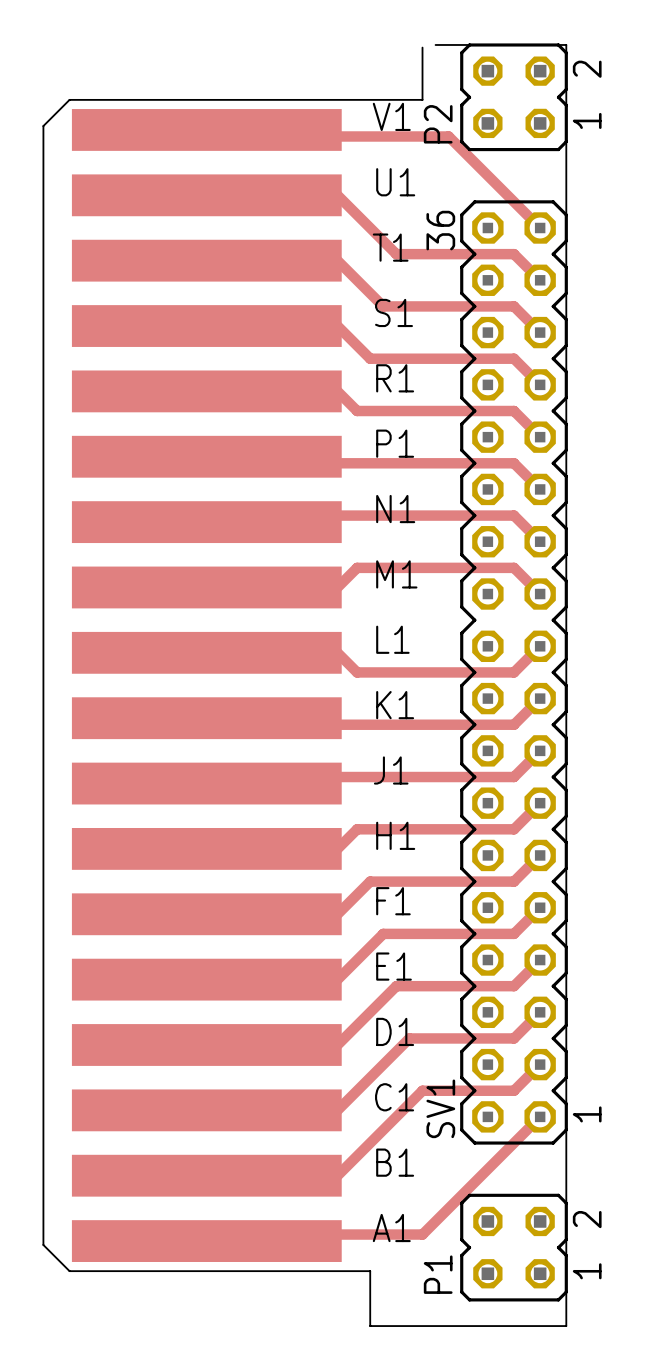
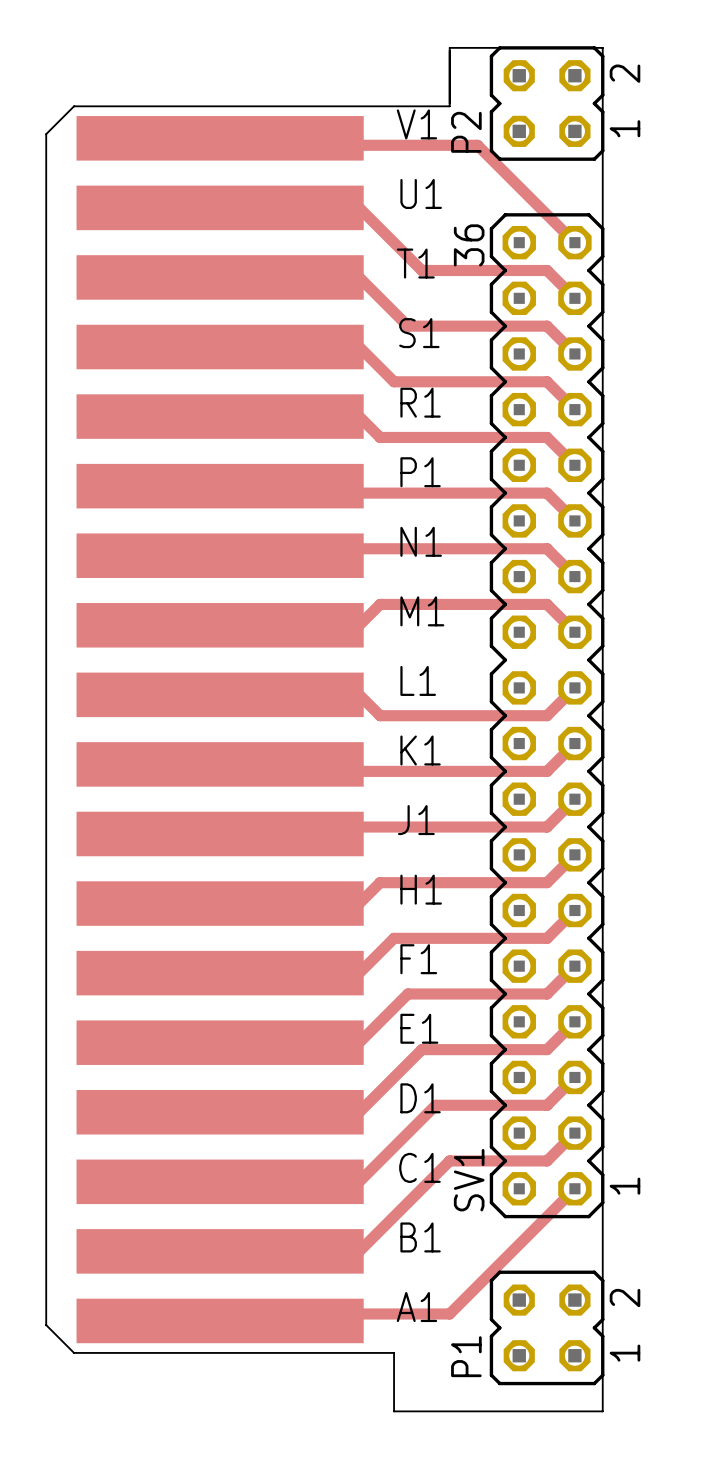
board edge: none -> (463, 47) (449, 47) (449, 103)

